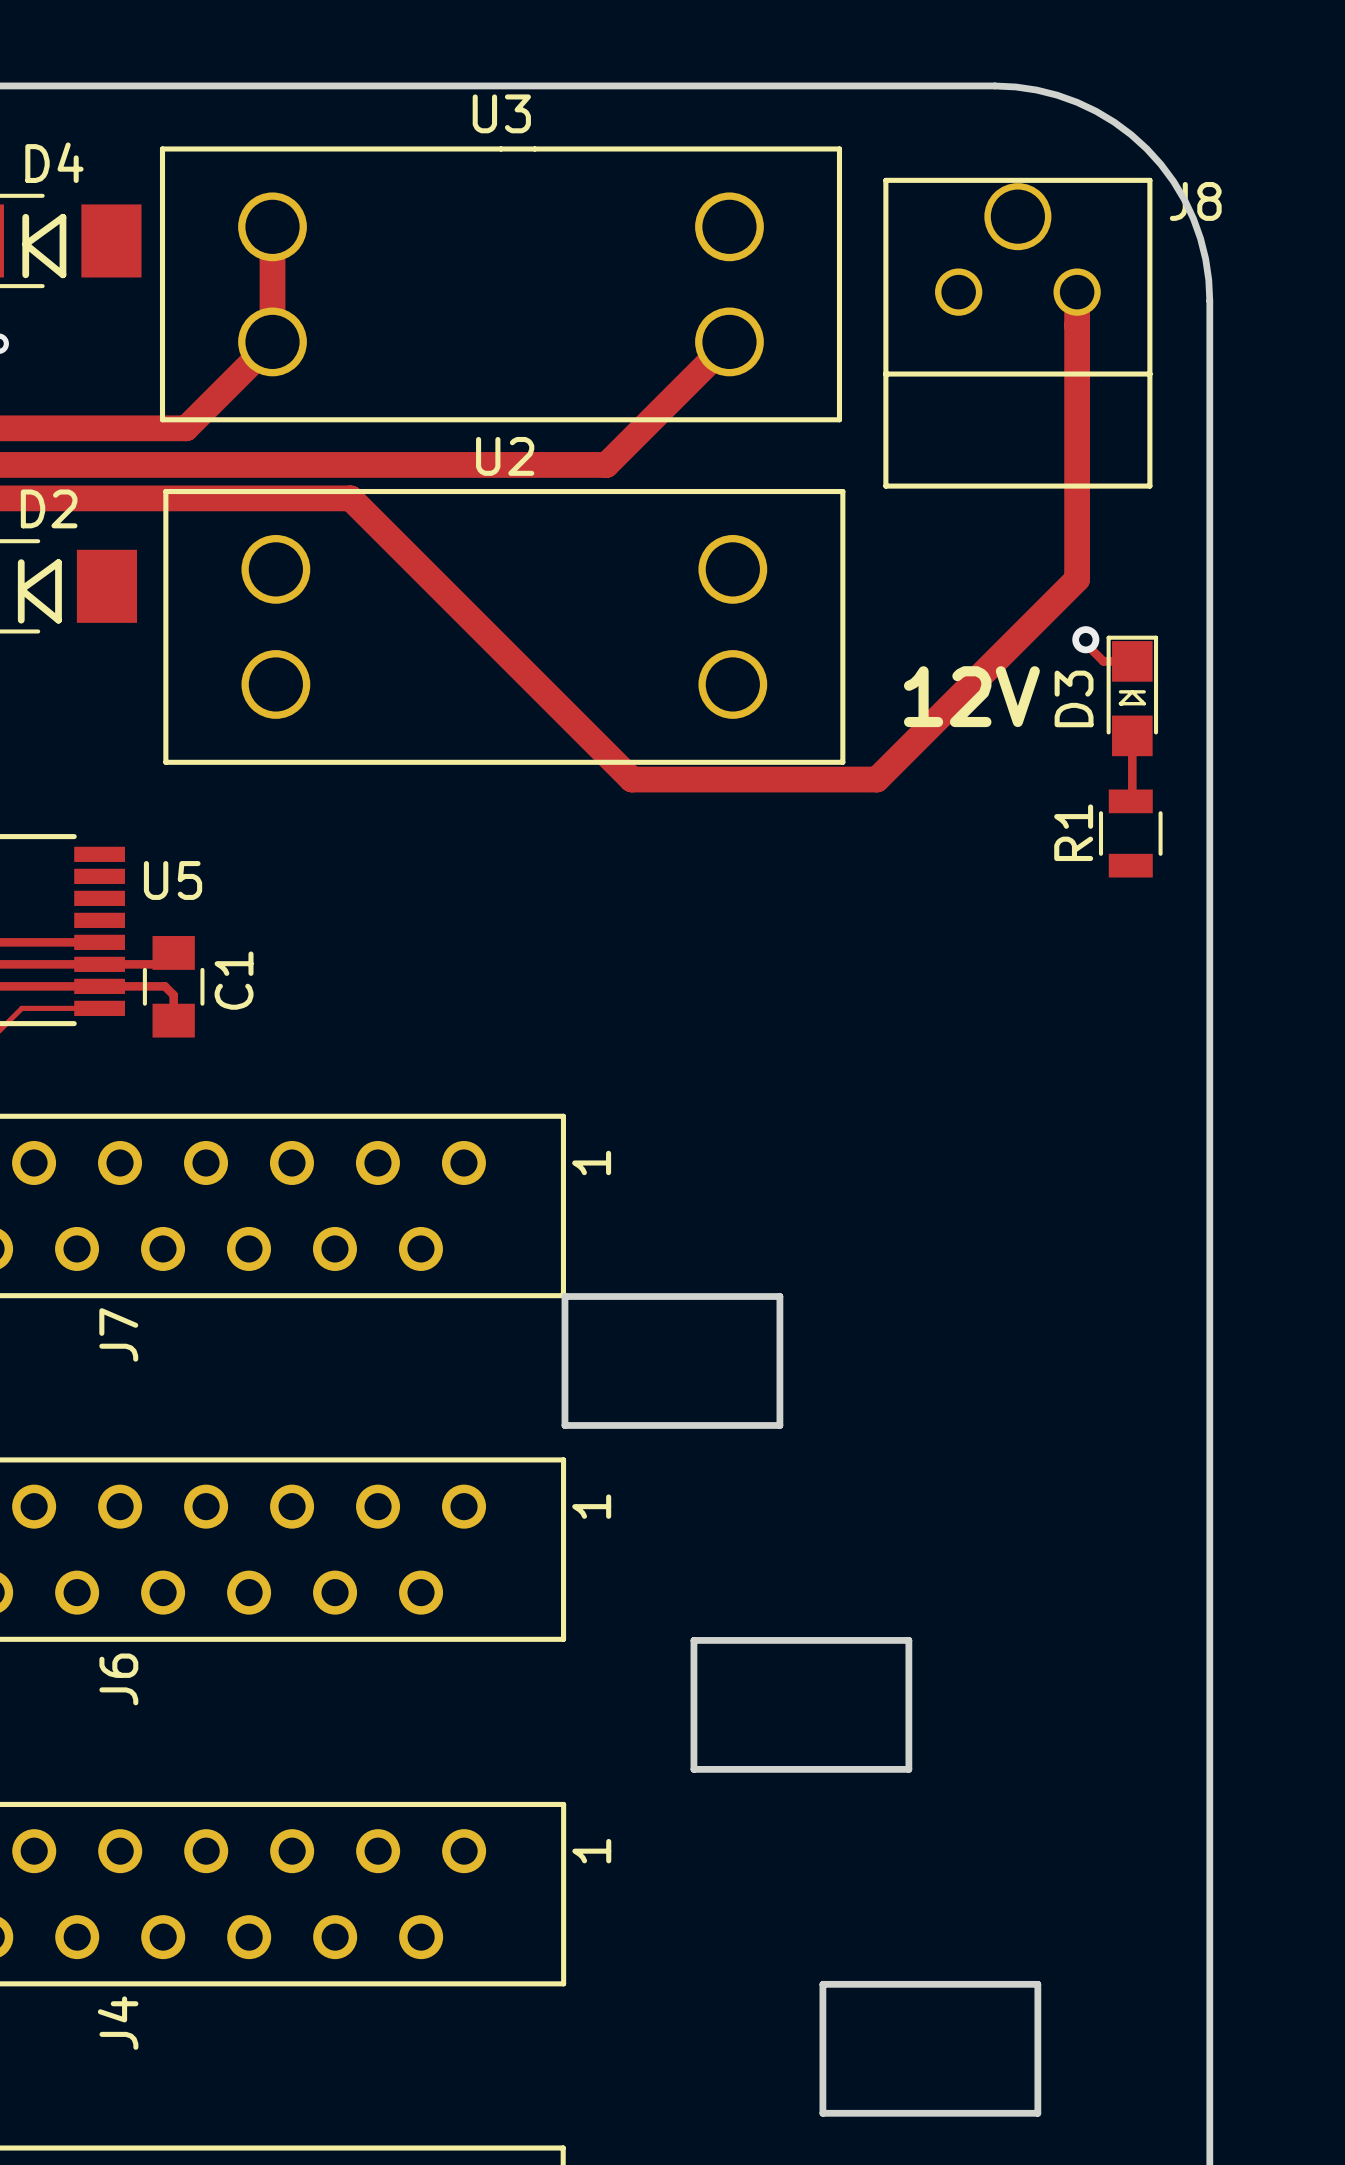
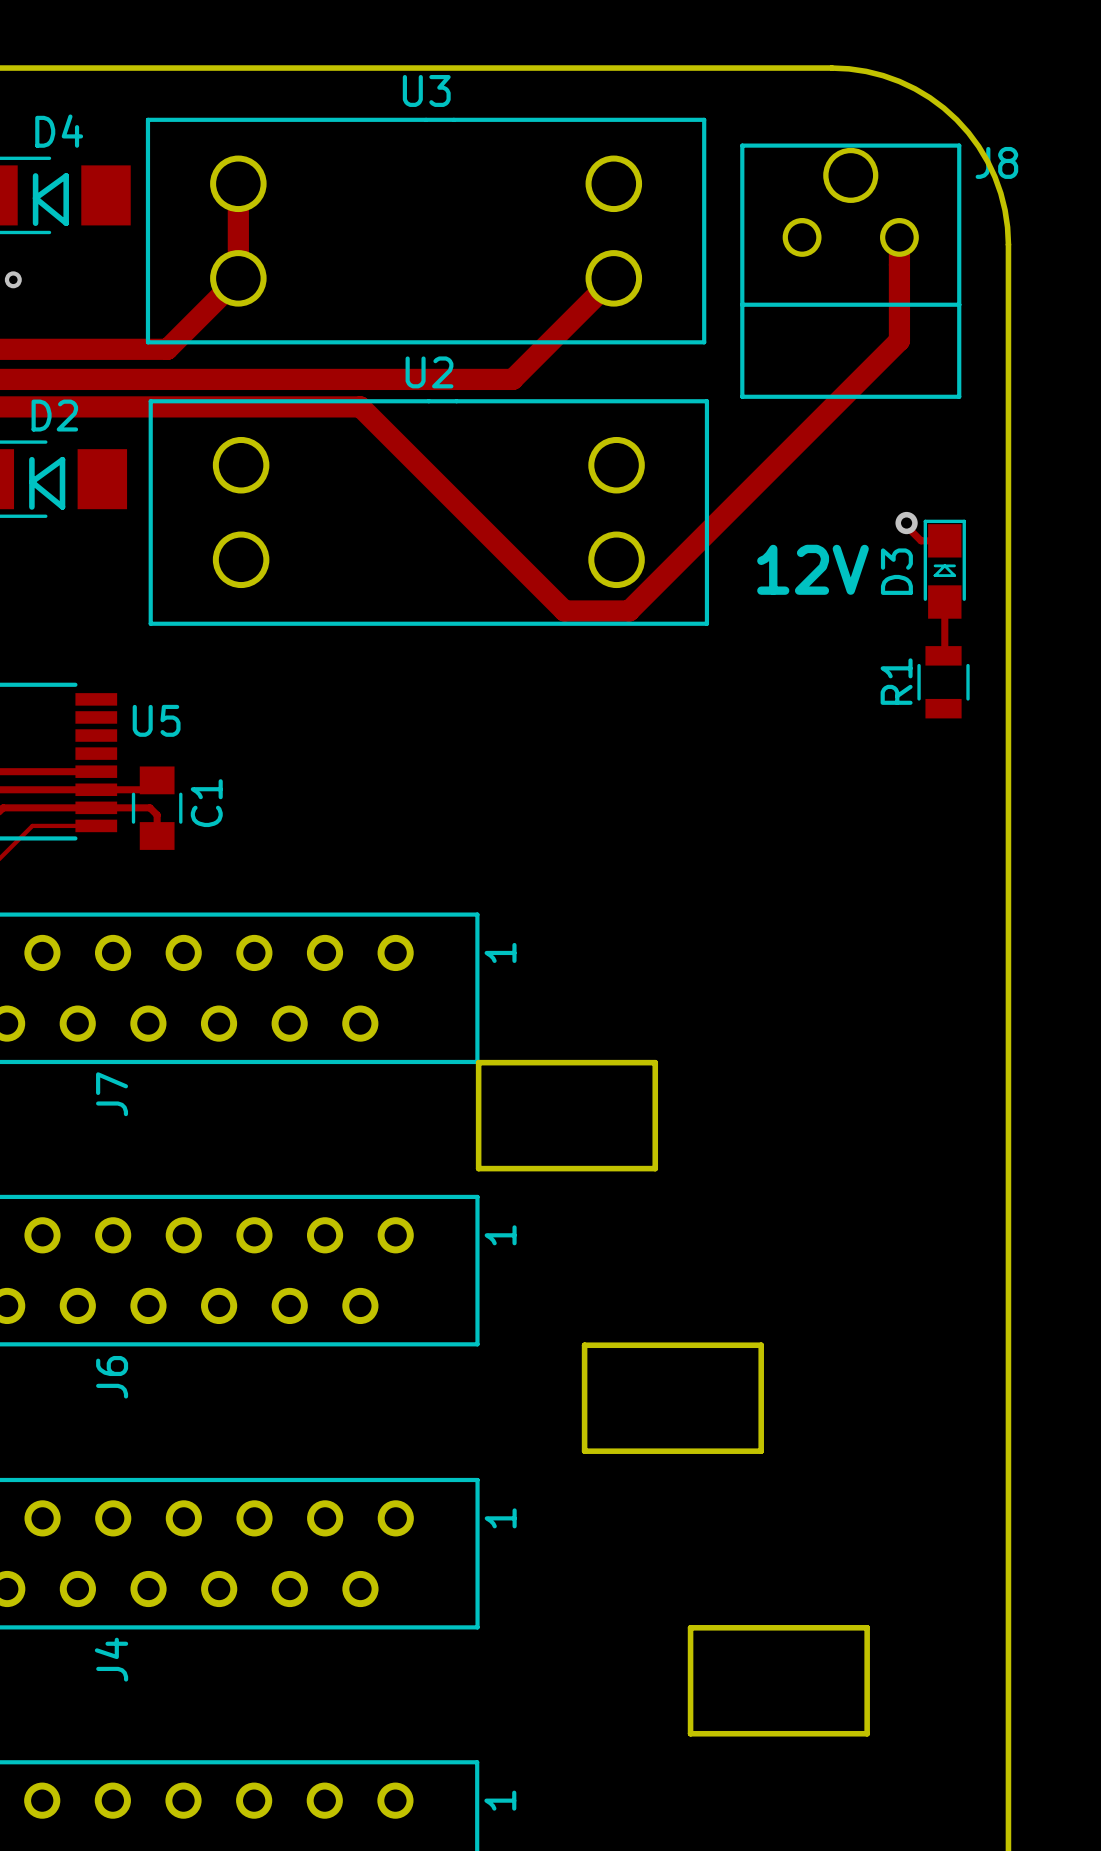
top track: (1077, 417) (1077, 579) (876, 779) (631, 779) (350, 498) -> (899, 340) (629, 610) (564, 610) (360, 406) (302, 406)

